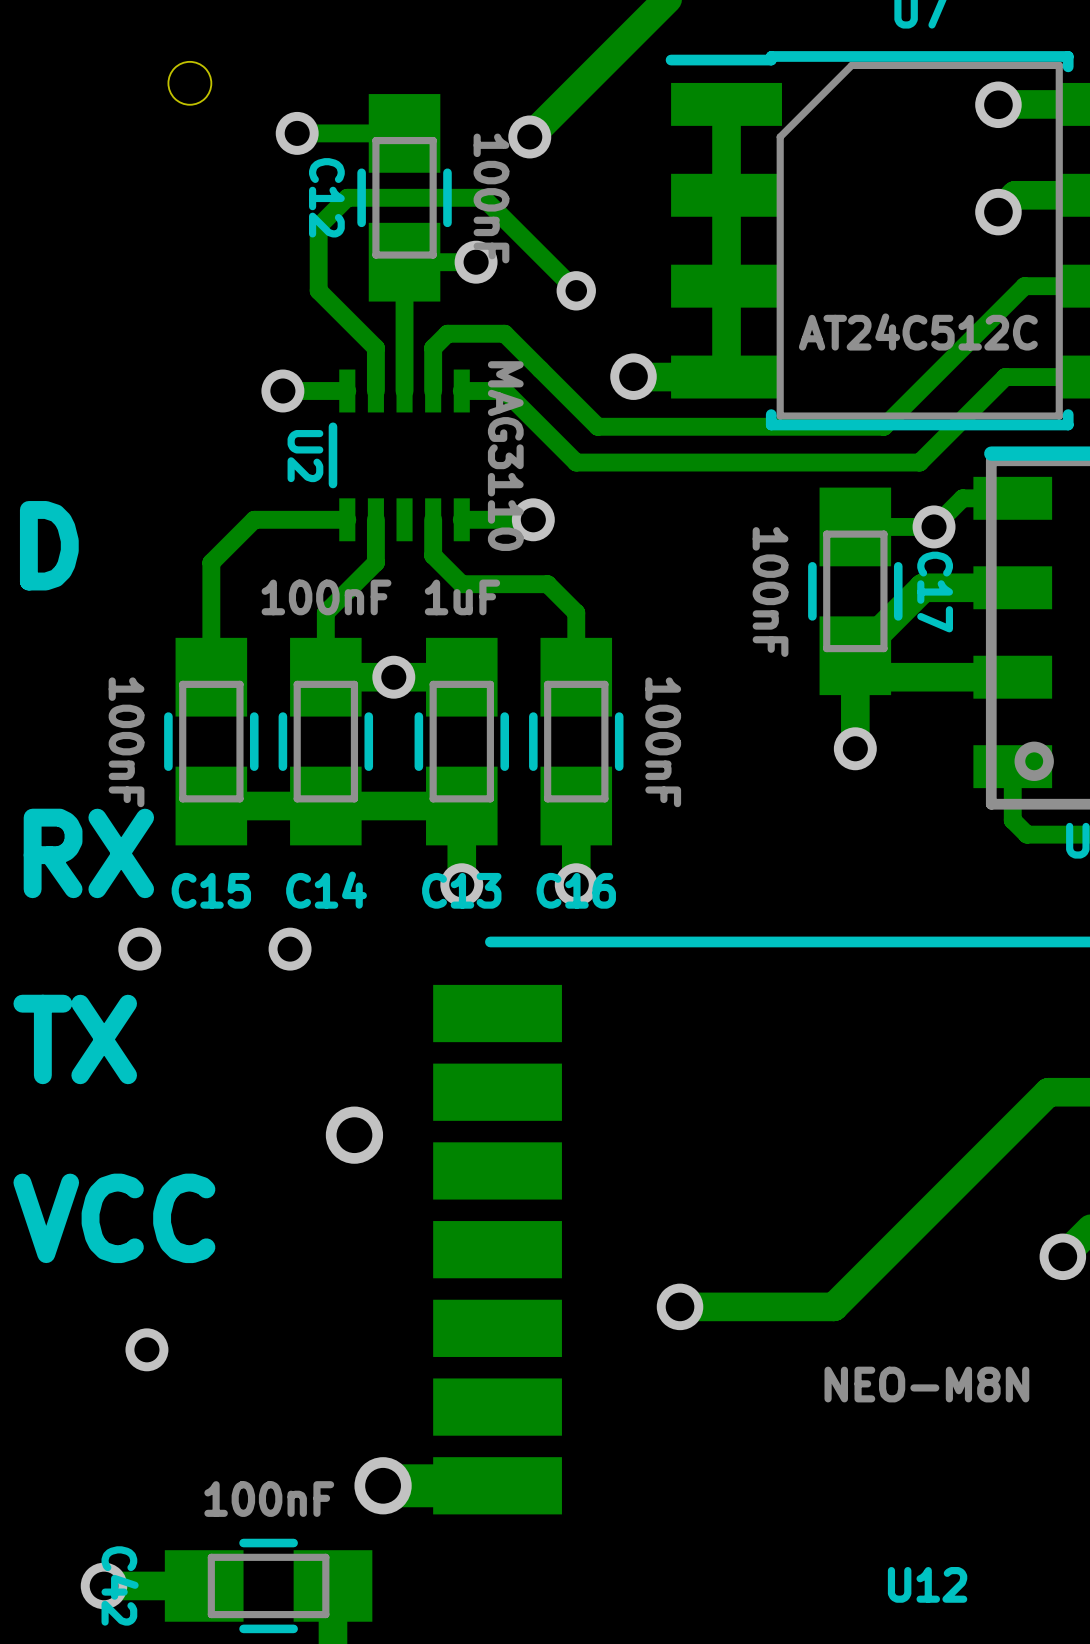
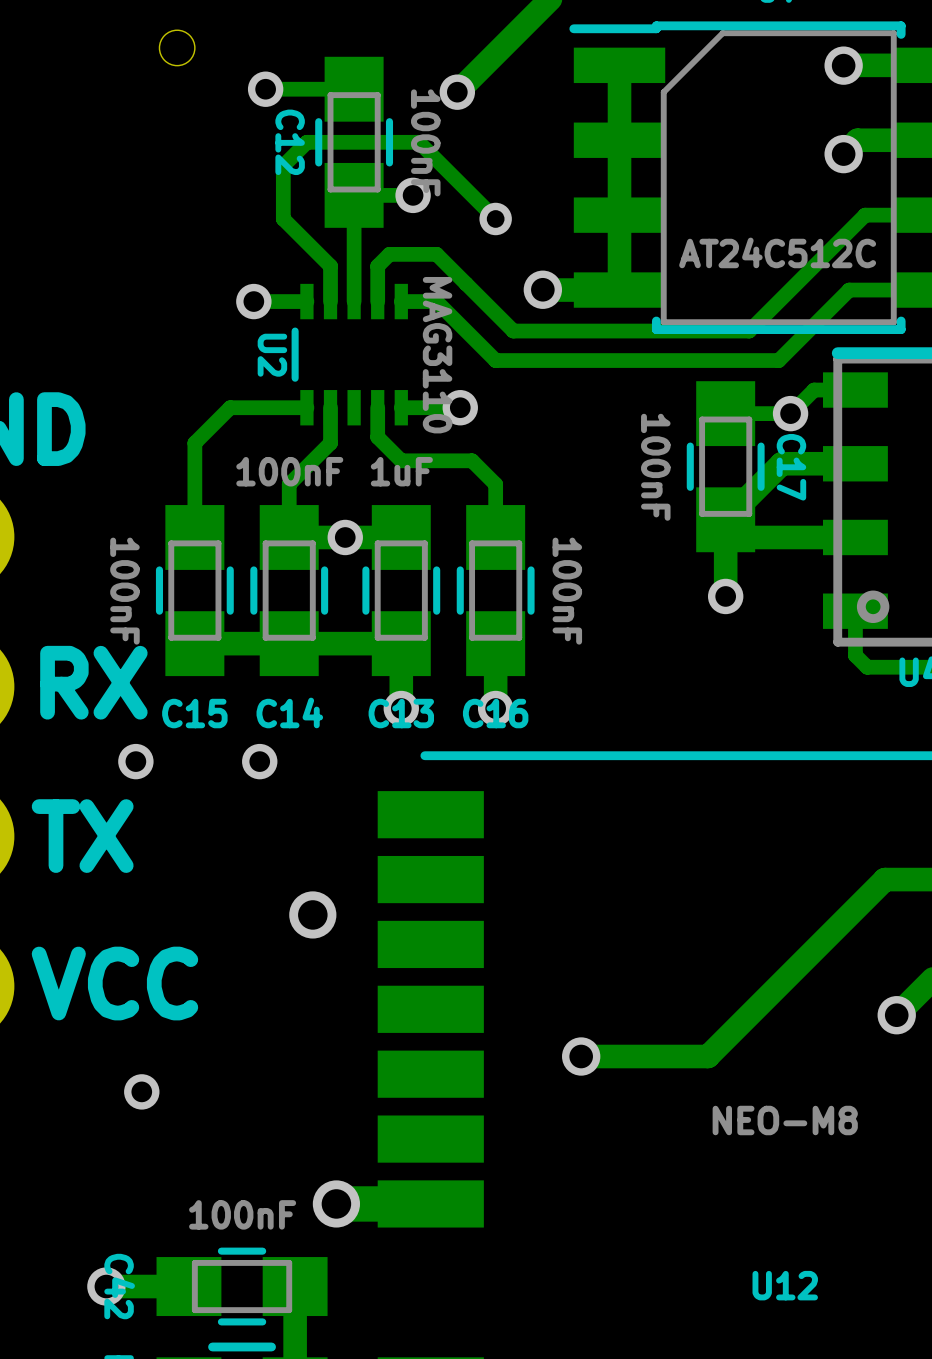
U12 value: NEO-M8N (926, 1384) -> NEO-M8 (785, 1120)

